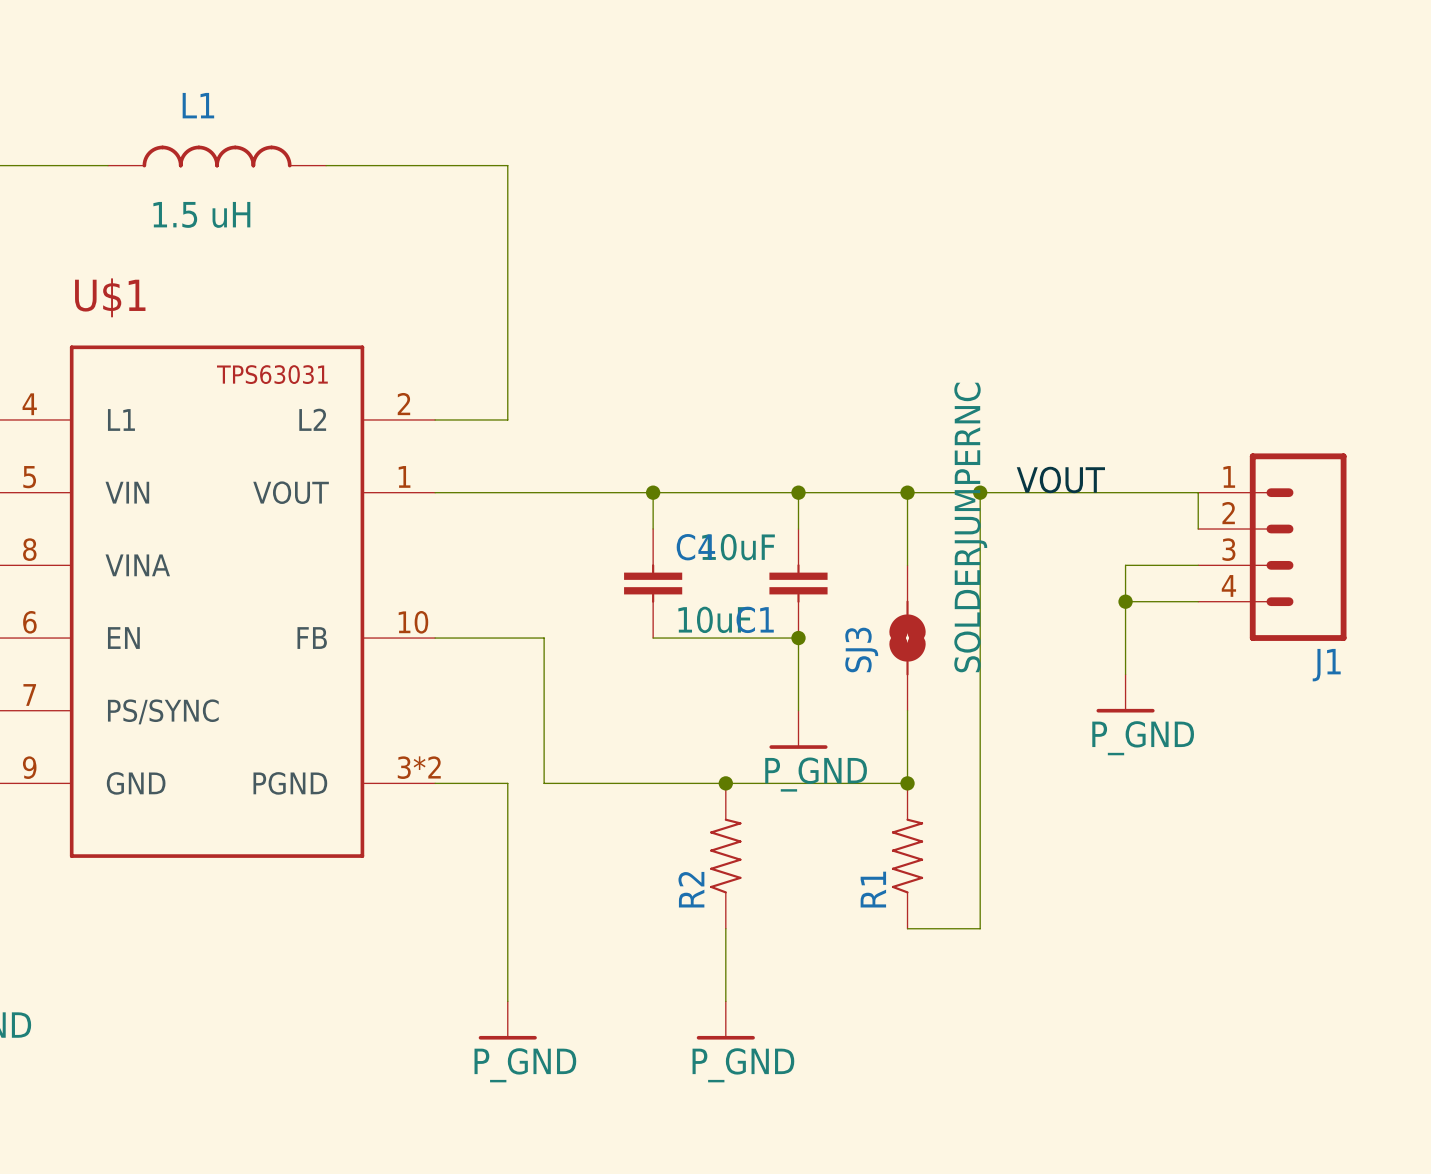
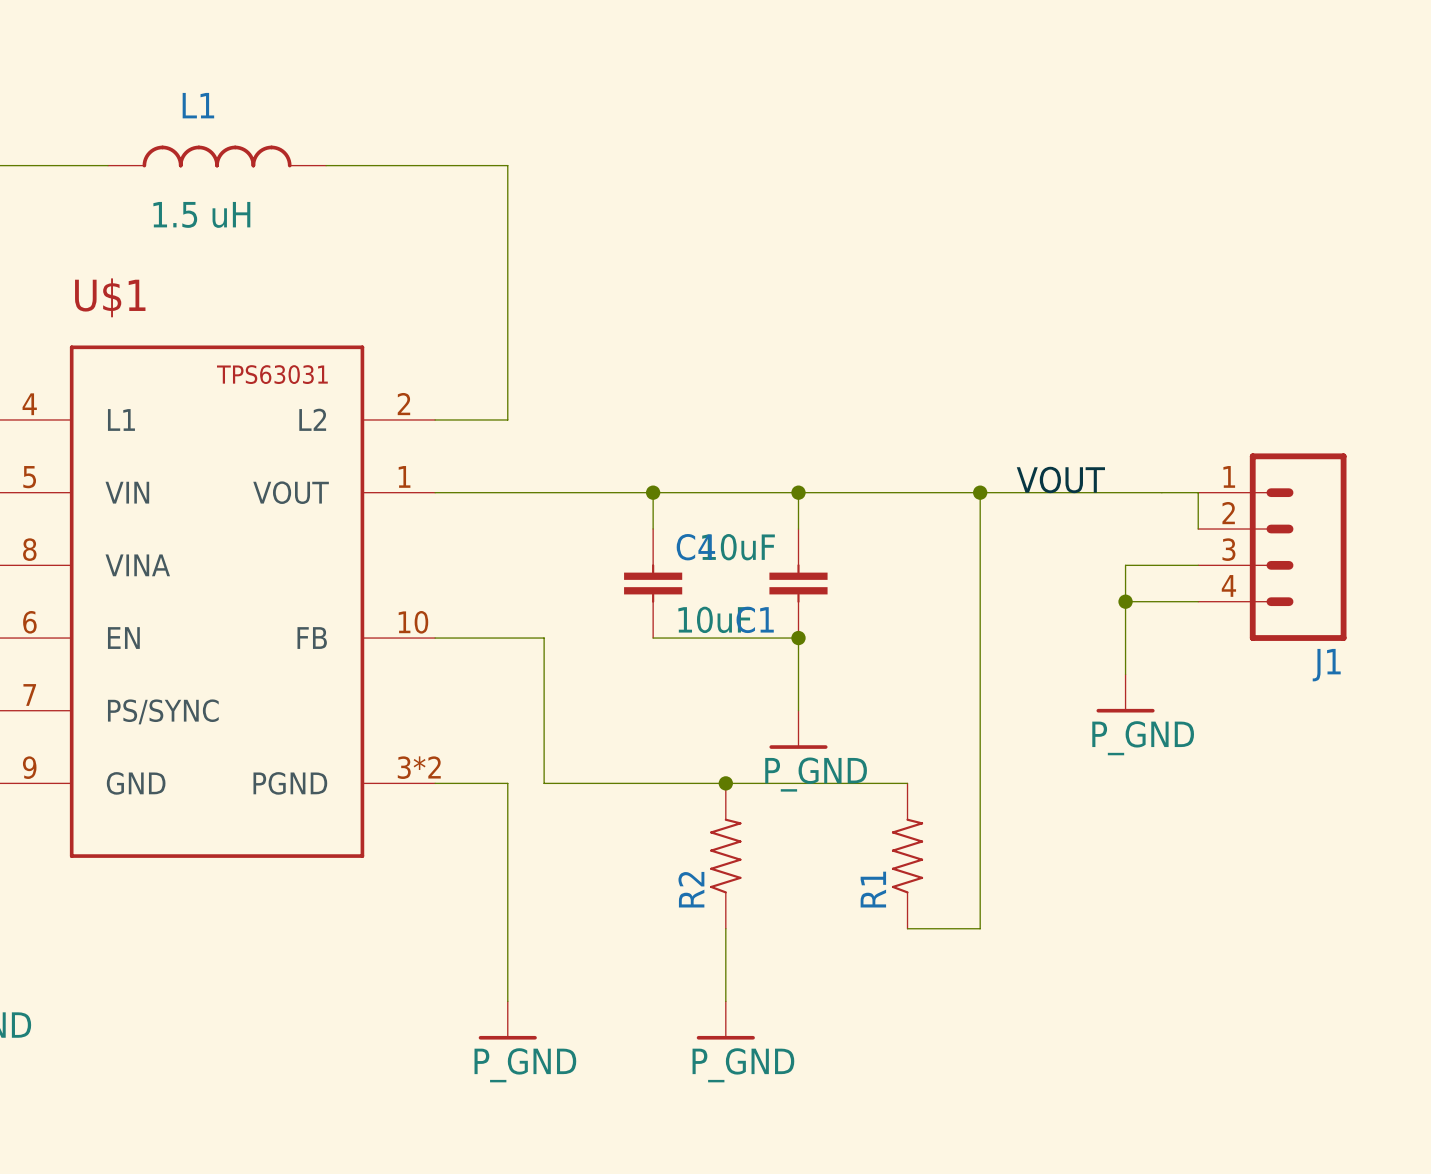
wire: (907, 492) (907, 565) -> none
junction: (907, 492) -> none
SJ3: SOLDERJUMPERNC (907, 638) -> none
wire: (907, 710) (907, 783) -> none
junction: (907, 783) -> none

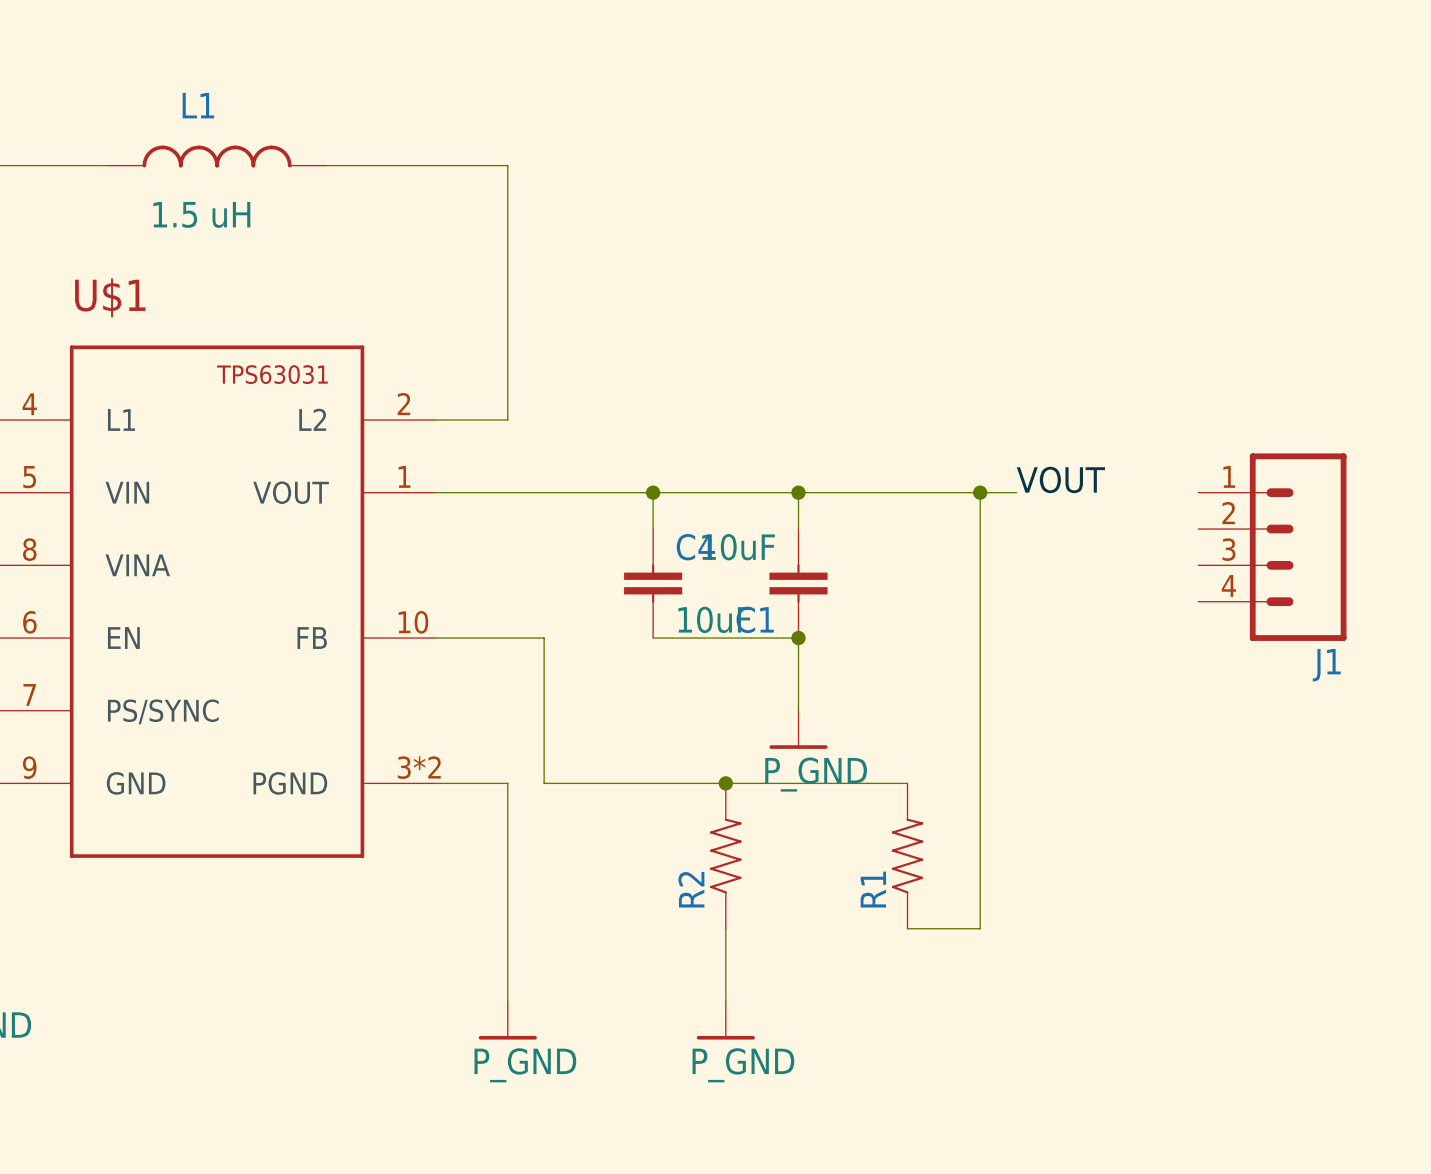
wire: (1016, 492) (1198, 492) (1198, 529) -> none
wire: (1198, 565) (1125, 565) (1125, 674) -> none
wire: (1125, 601) (1198, 601) -> none
junction: (1125, 601) -> none
power symbol: P_GND (1125, 693) -> none

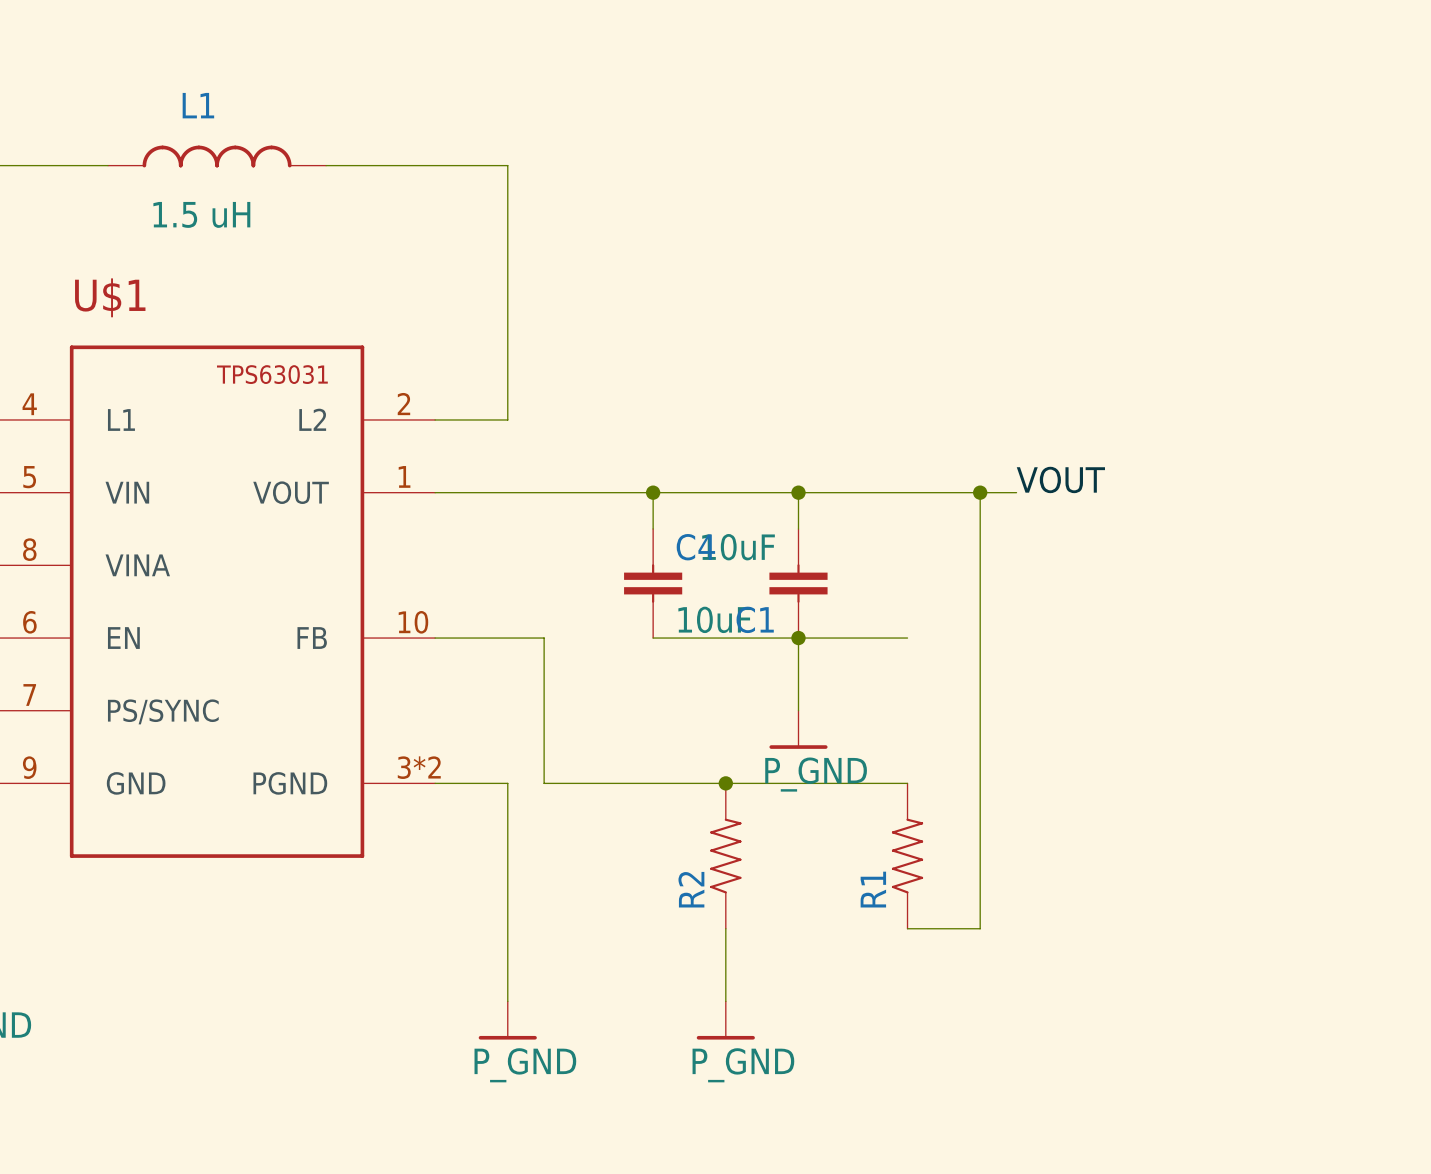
J1: (1272, 547) -> none
wire: none -> (798, 638) (907, 638)

